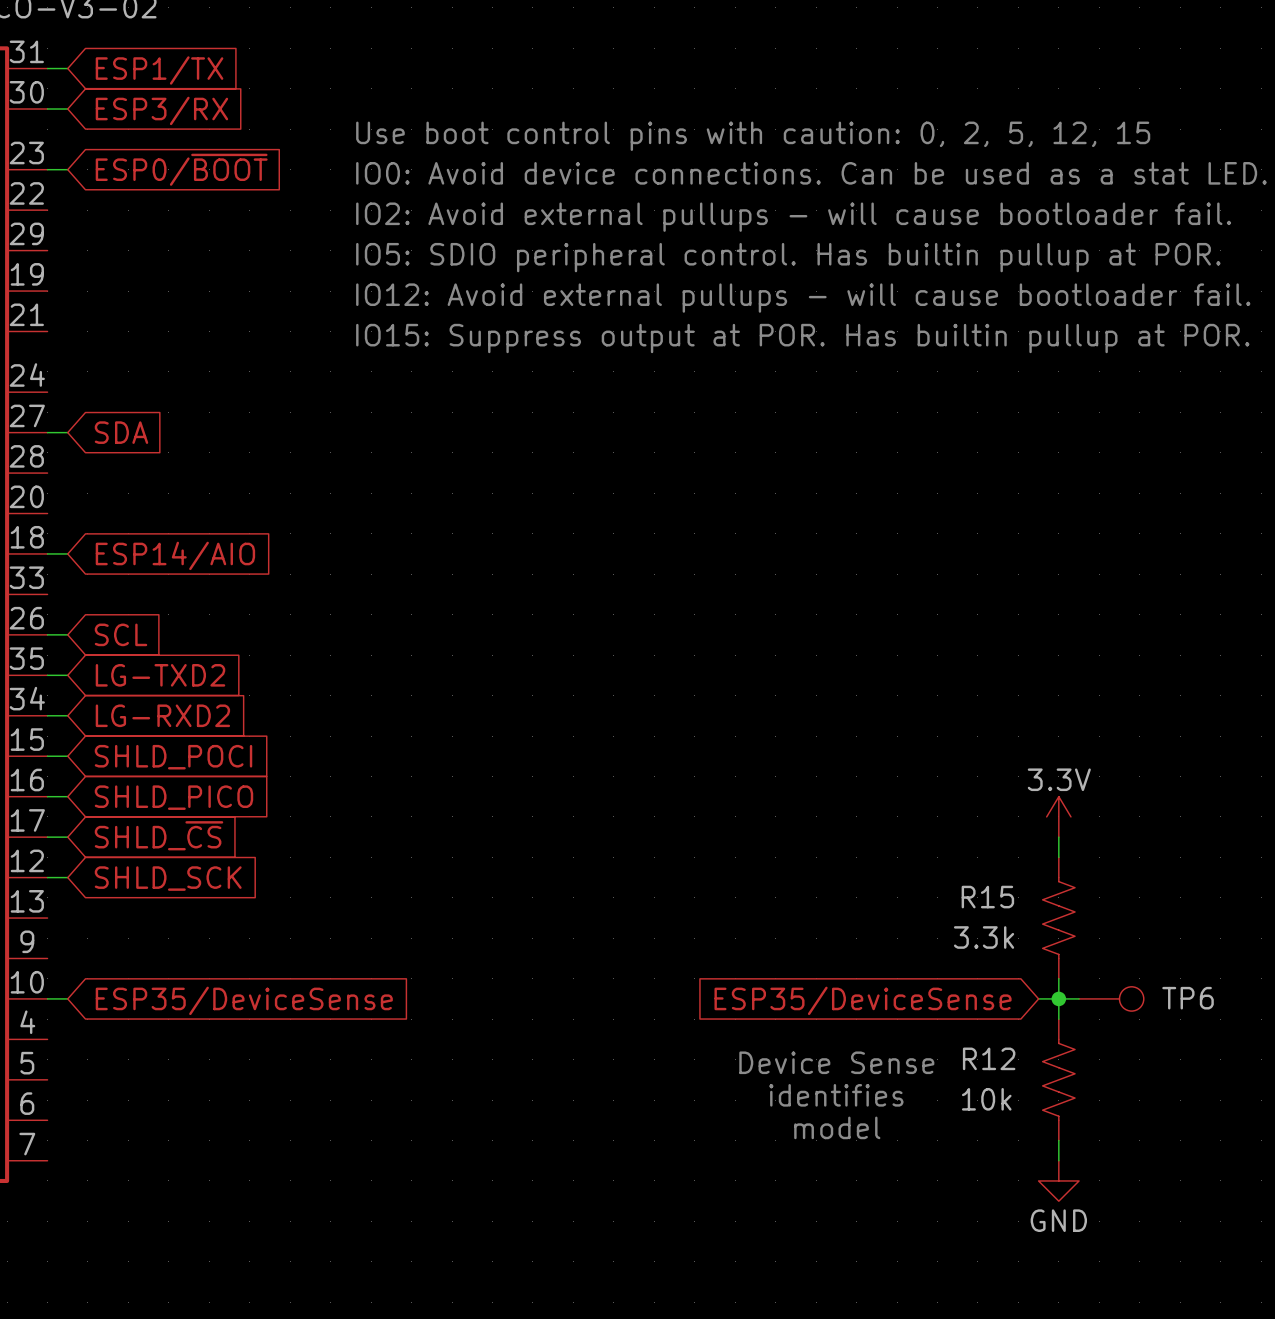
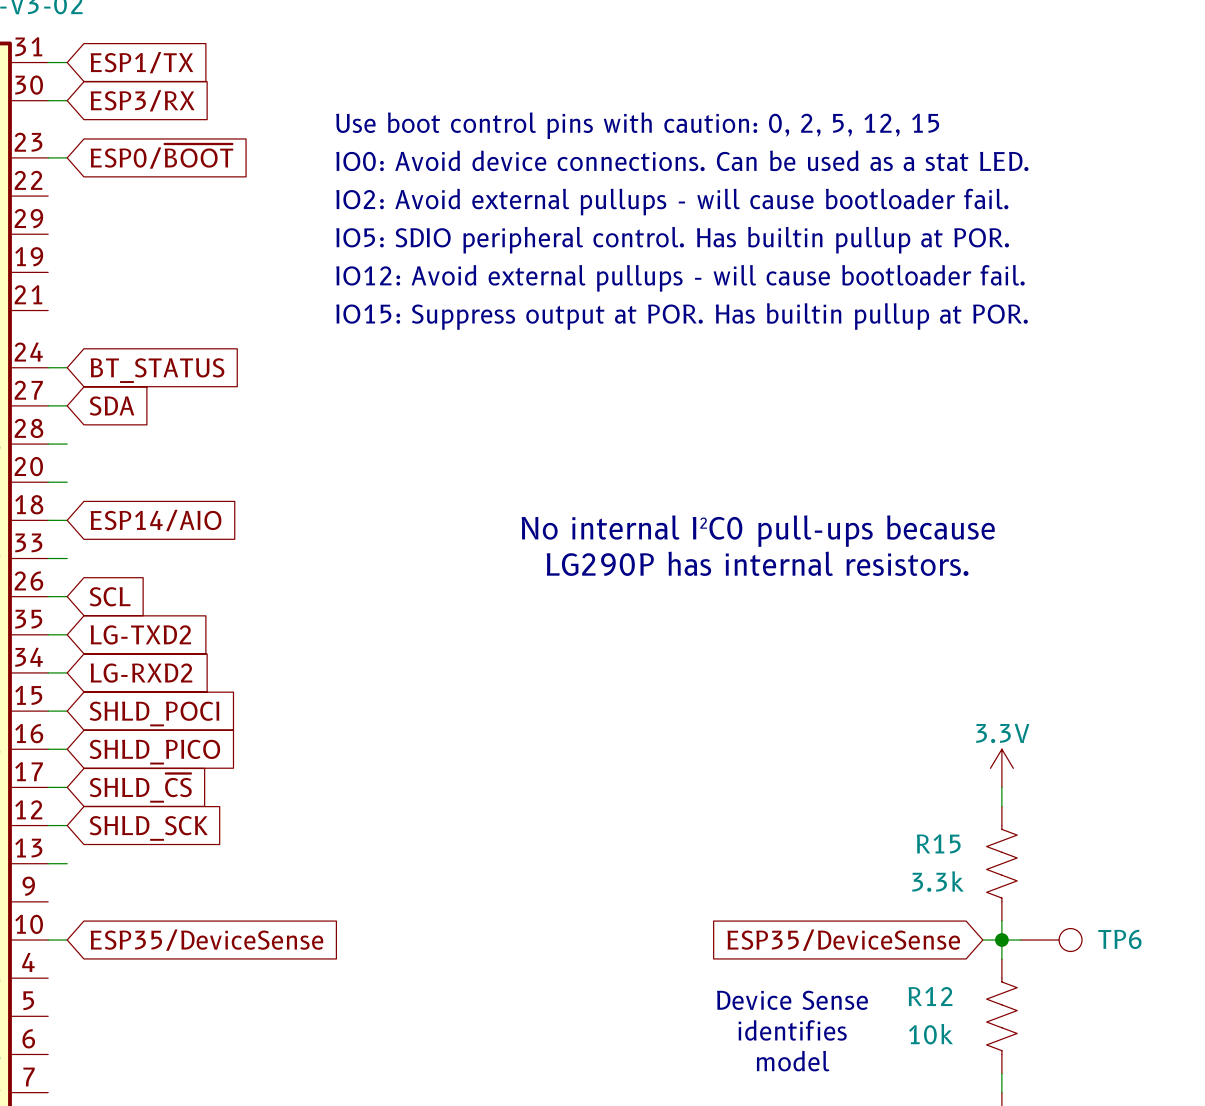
wire: none -> (48, 367) (67, 367)
global label: none -> BT_STATUS (157, 370)
wire: none -> (48, 444) (67, 444)
wire: none -> (48, 482) (67, 482)
text: none -> No internal I²C0 pull-ups because (758, 531)
wire: none -> (48, 558) (67, 558)
text: none -> LG290P has internal resistors. (757, 563)
wire: none -> (48, 863) (67, 863)

